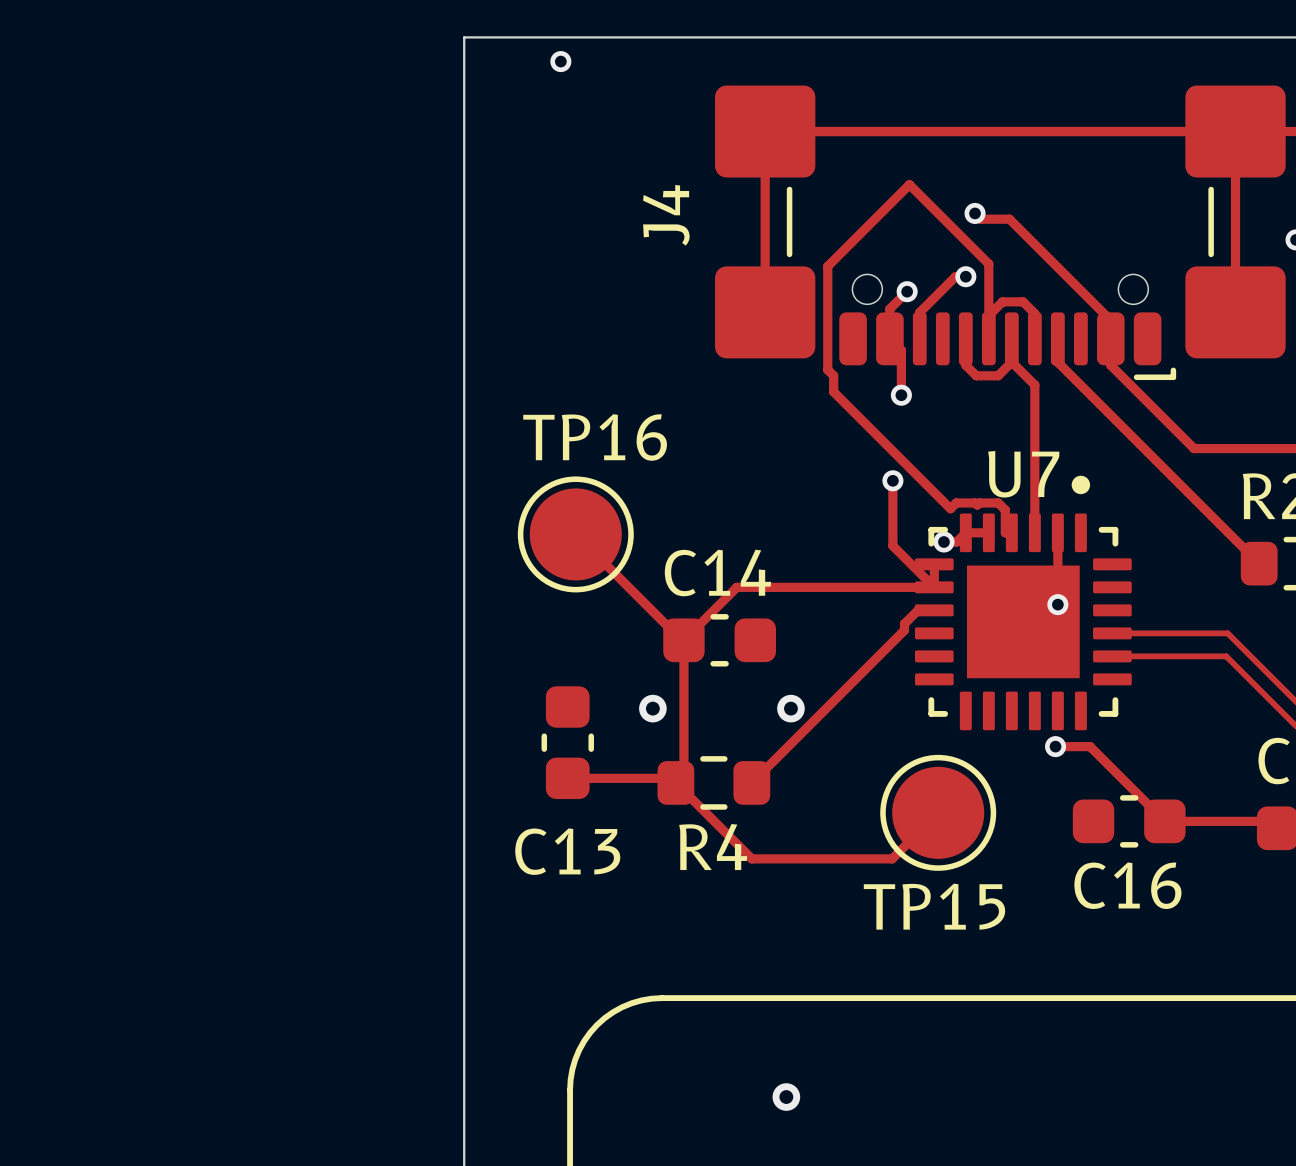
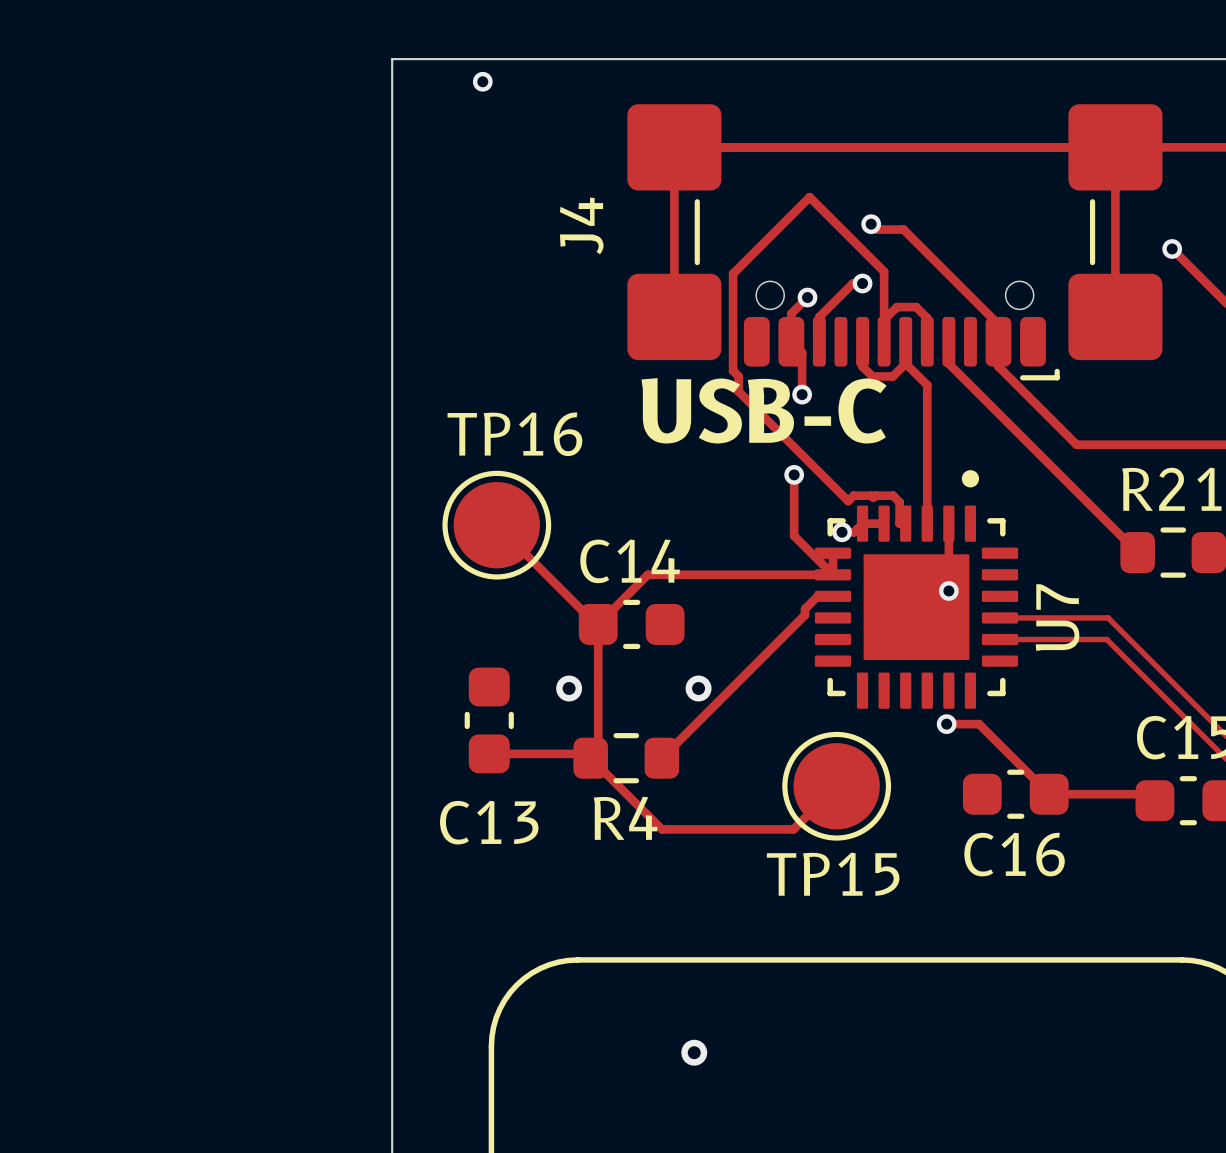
text: none -> USB-C (764, 410)
U7 name rotation: 0° (1023, 474) -> 90° counterclockwise (1057, 617)
U7 name position: U7 (1023, 474) -> U7 (1057, 617)

